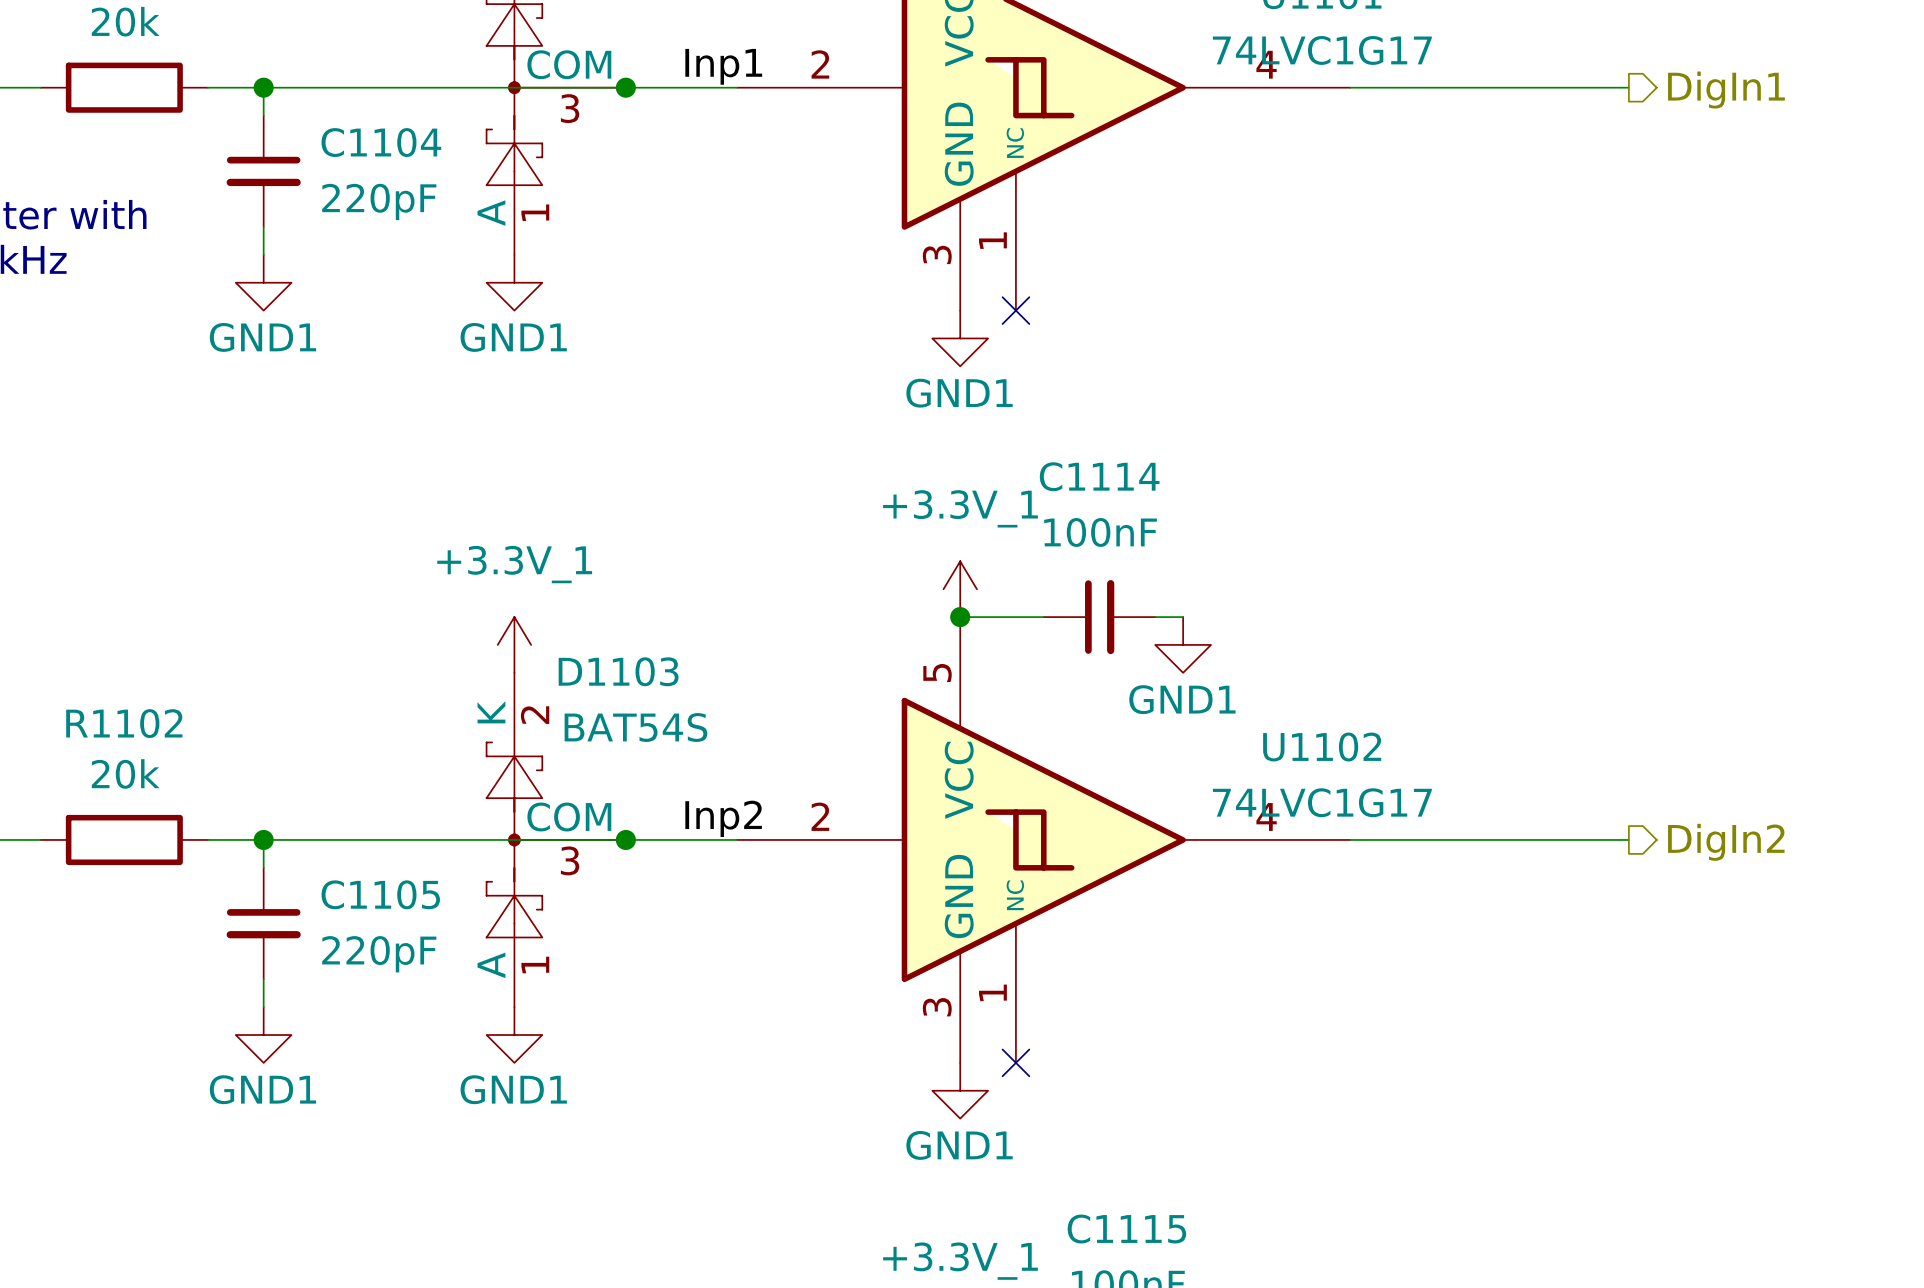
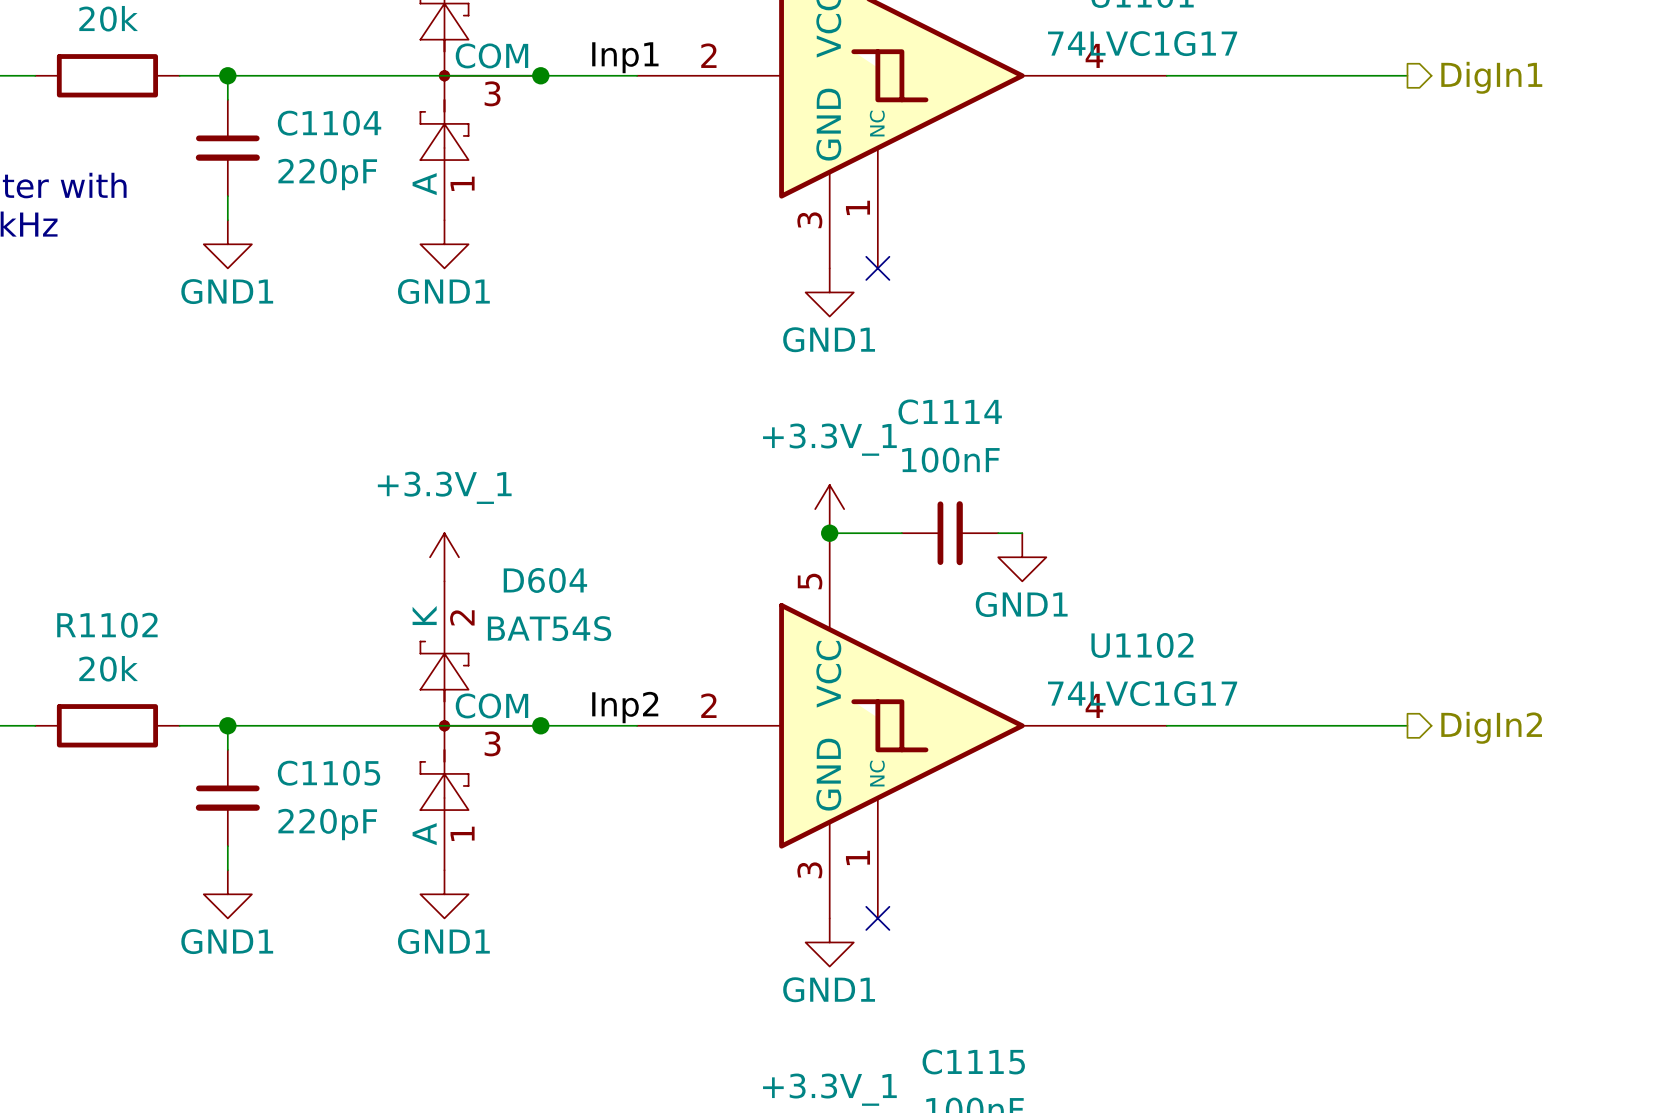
D1103 name: D1103 (618, 671) -> D604 (545, 580)

